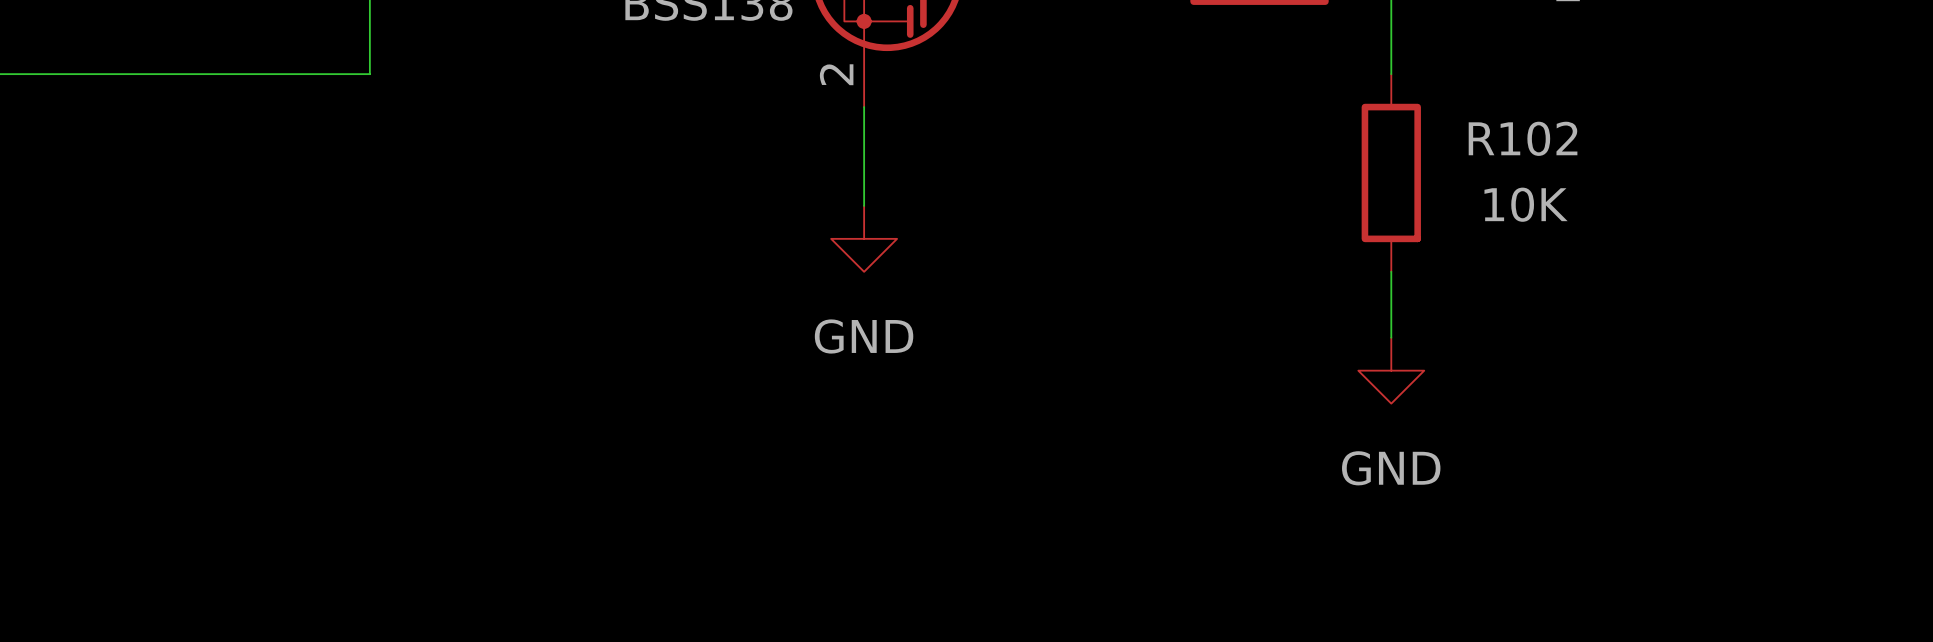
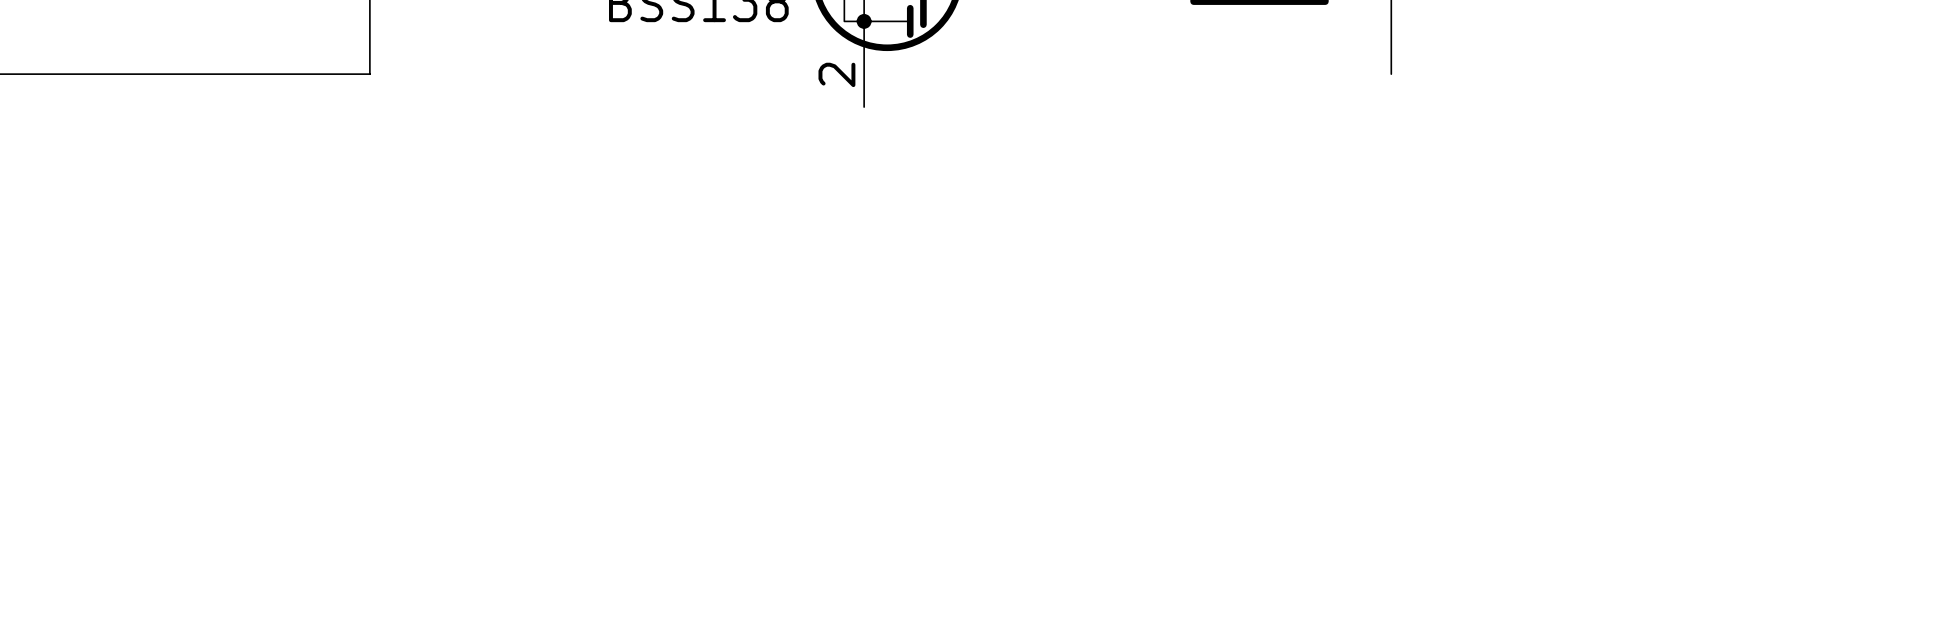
wire: (864, 107) (864, 205) -> none
R102: 10K (1391, 172) -> none
power symbol: GND (864, 238) -> none
wire: (1391, 271) (1391, 337) -> none
power symbol: GND (1391, 370) -> none

